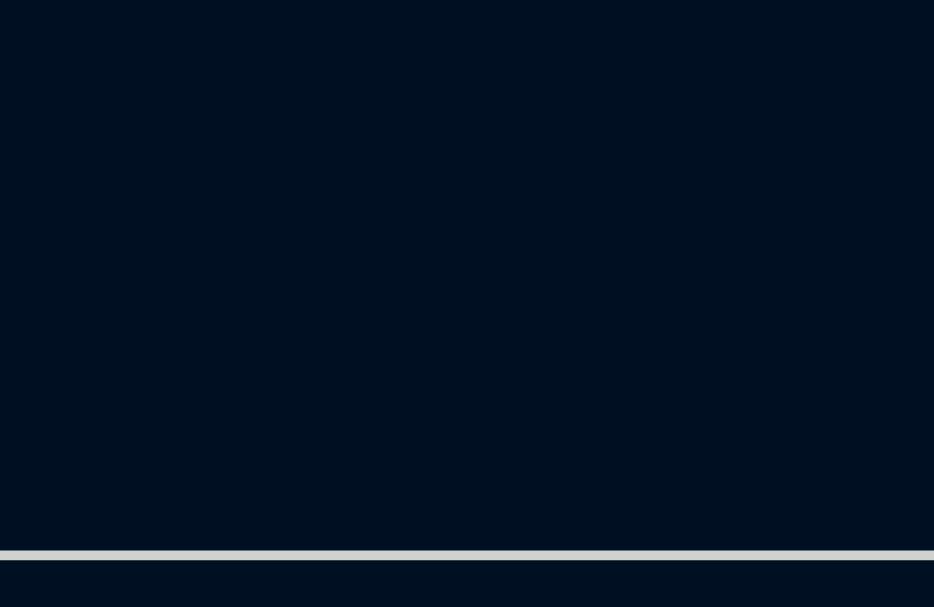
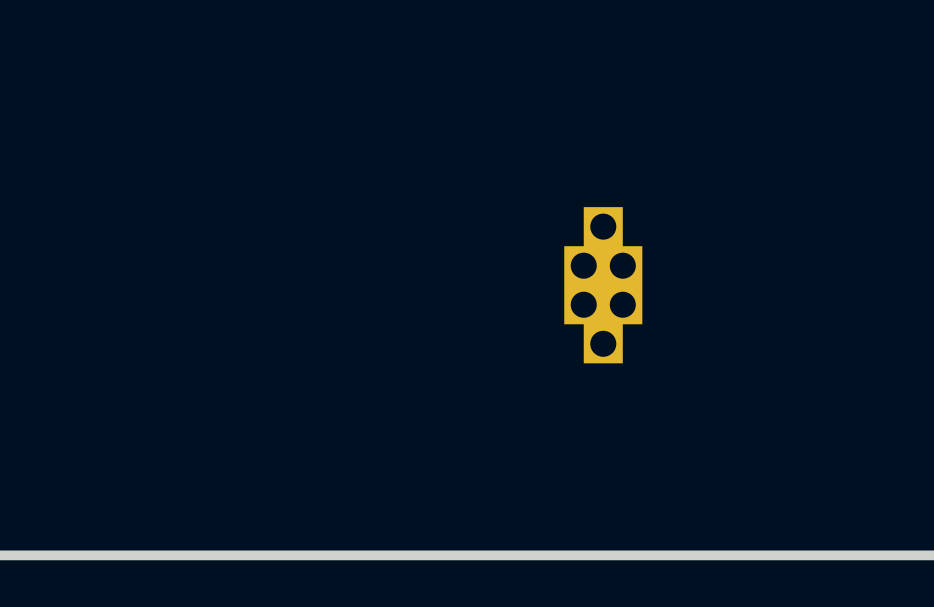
part: none -> (603, 285)

